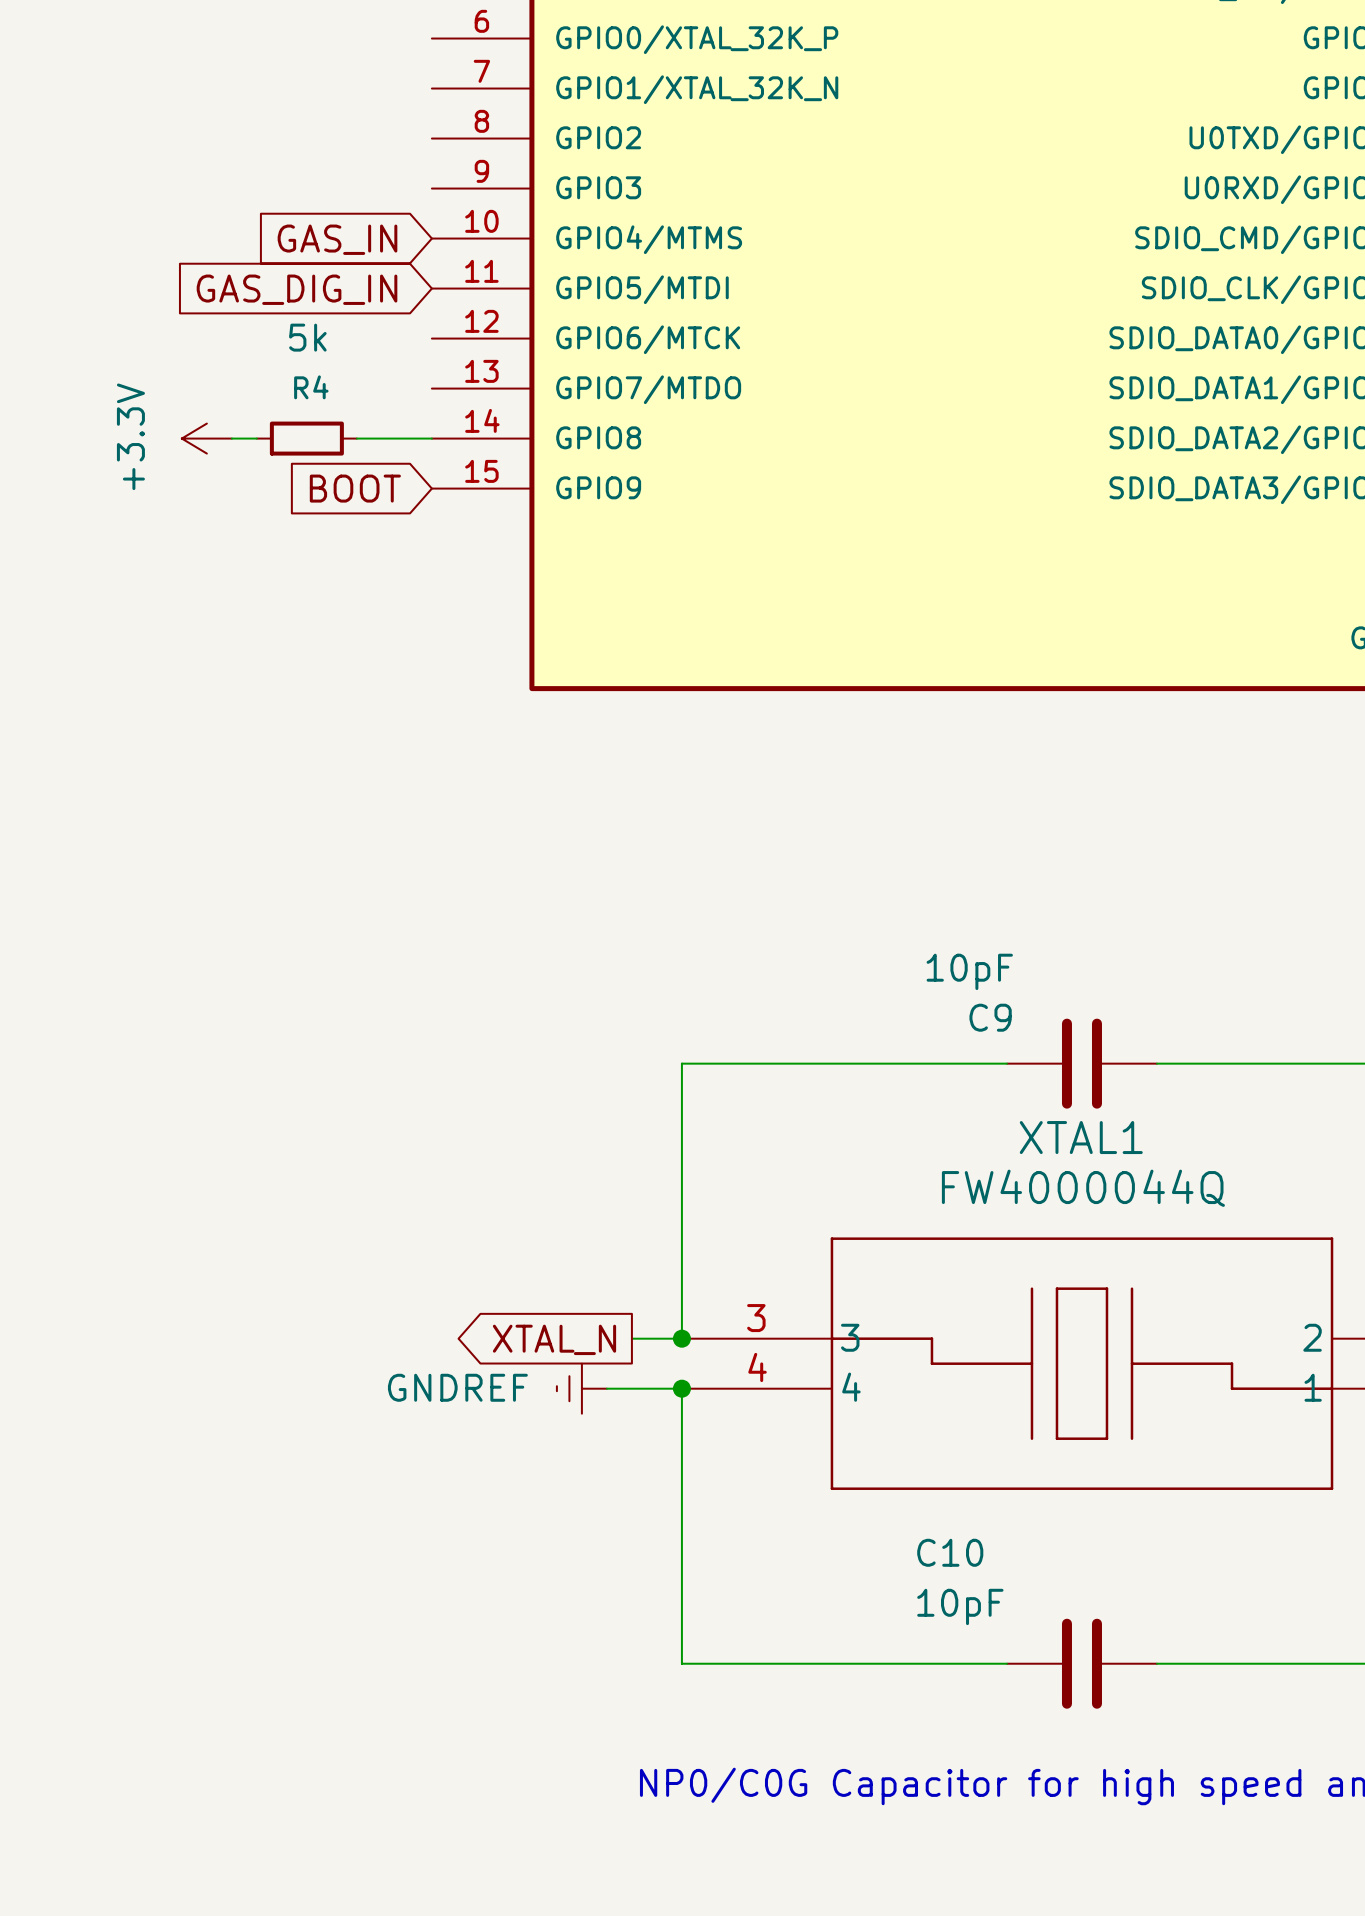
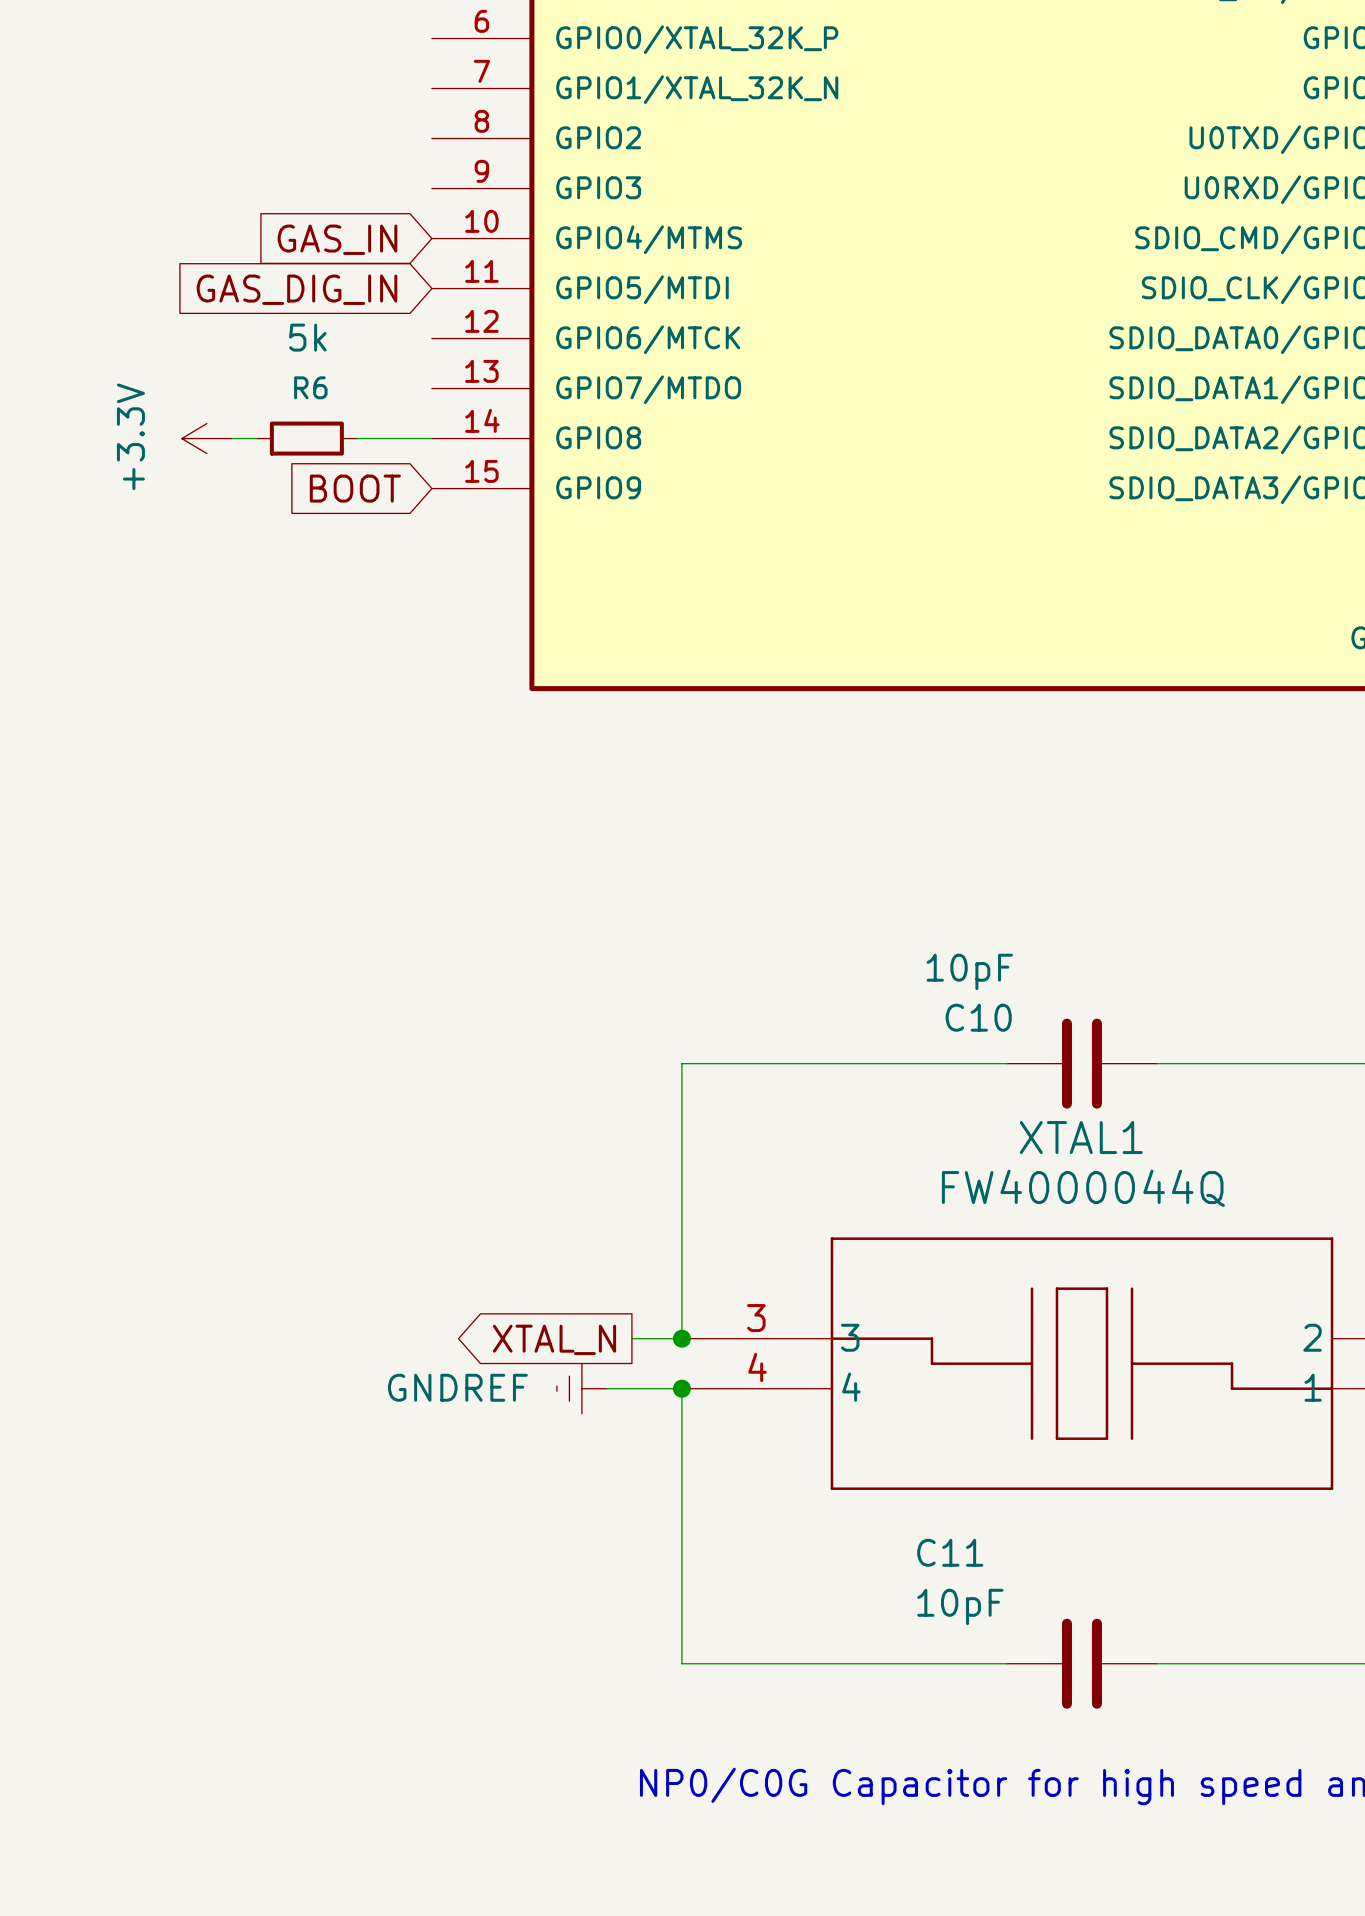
R4 name: R4 (311, 387) -> R6 (310, 387)
C9 name: C9 (990, 1017) -> C10 (978, 1017)
C10 name: C10 (950, 1552) -> C11 (950, 1552)

